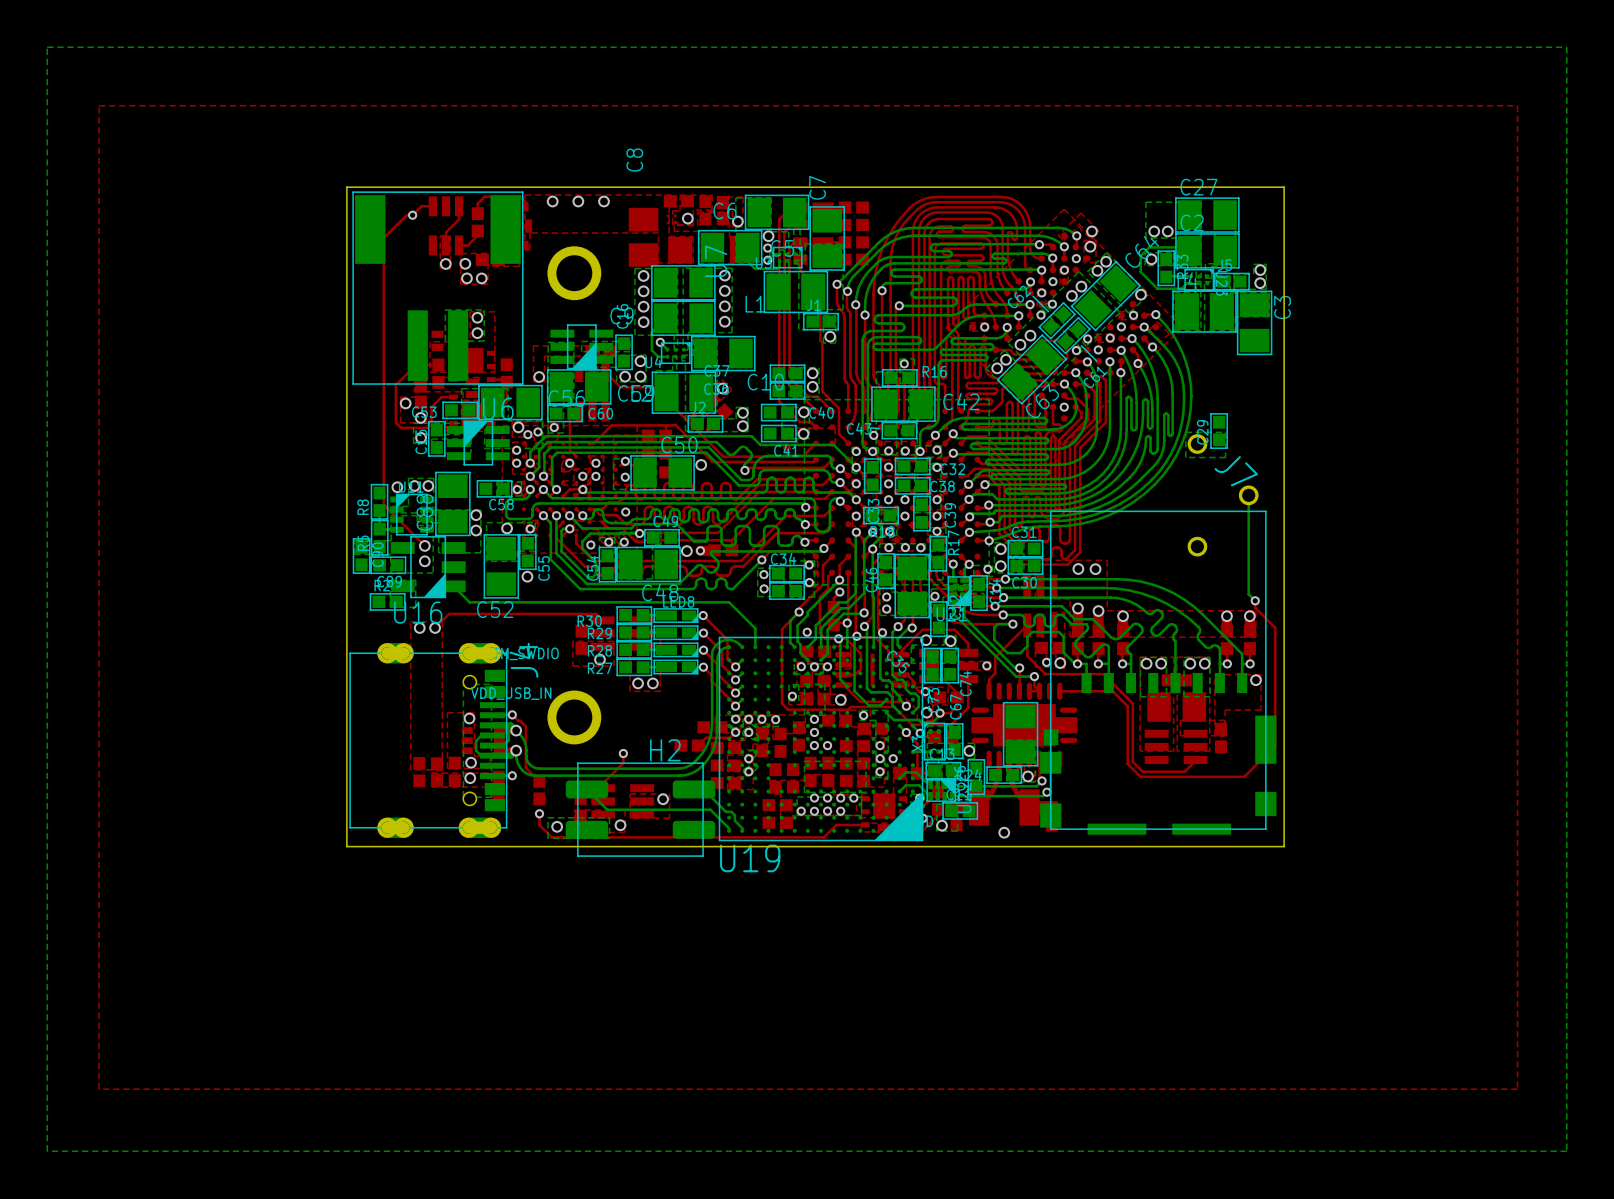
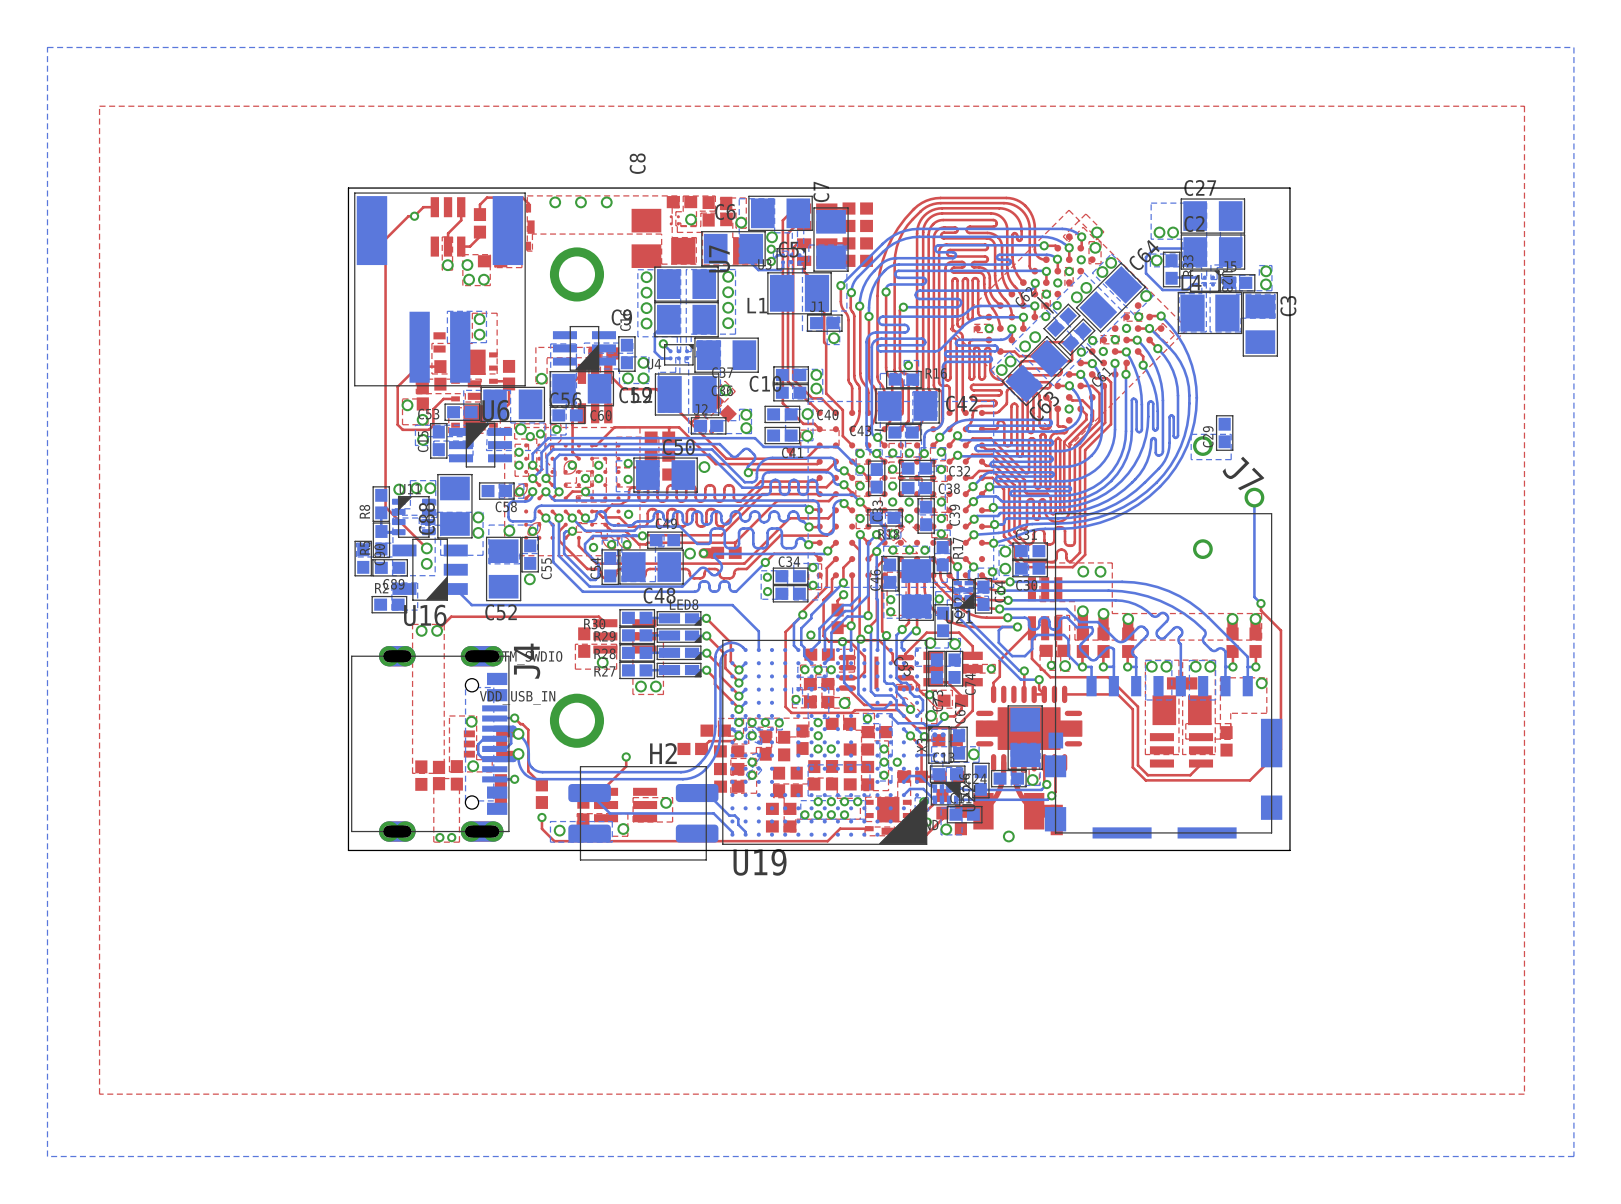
top zone outline: (431, 775) (431, 773) (488, 773) (488, 787) (431, 787) -> (433, 778) (459, 778) (459, 842) (433, 842) (433, 790)
via: (470, 778) -> none
via: none -> (439, 837)
via: none -> (451, 837)

